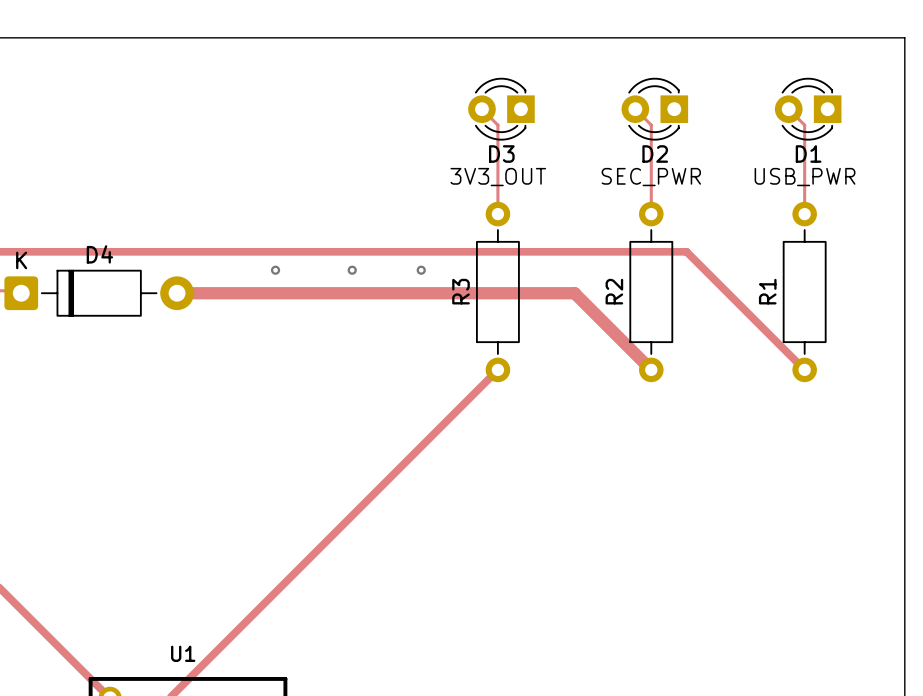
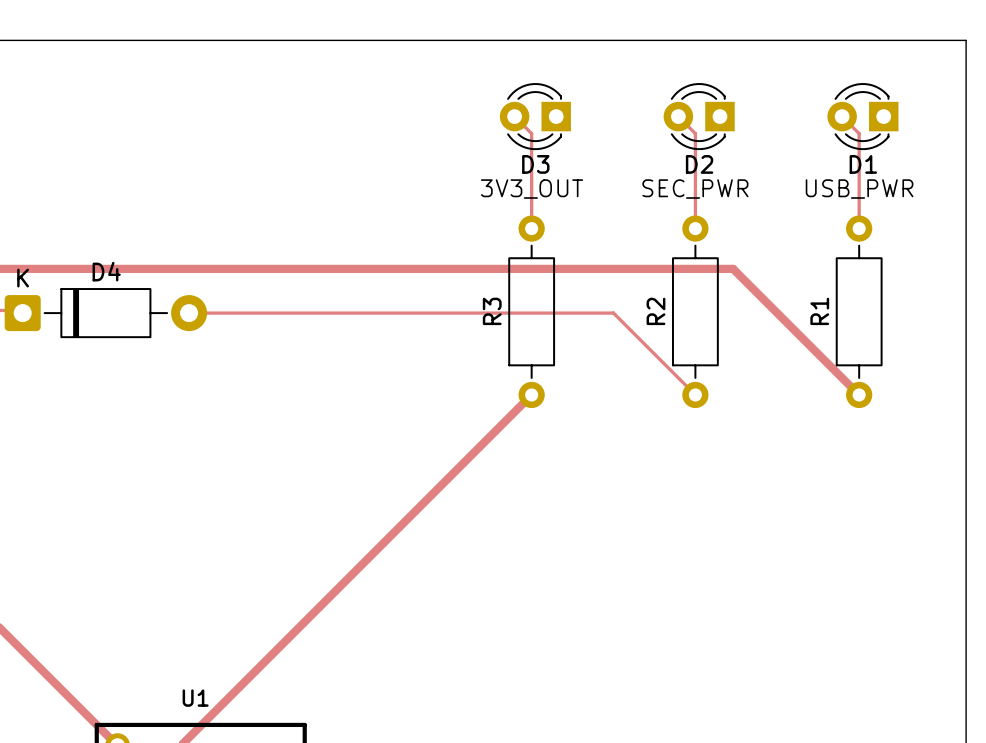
via: (275, 270) -> none
via: (352, 270) -> none
via: (421, 270) -> none
track width: thick (177, 293) (574, 293) (651, 369) -> thin (189, 313) (613, 313) (695, 394)

